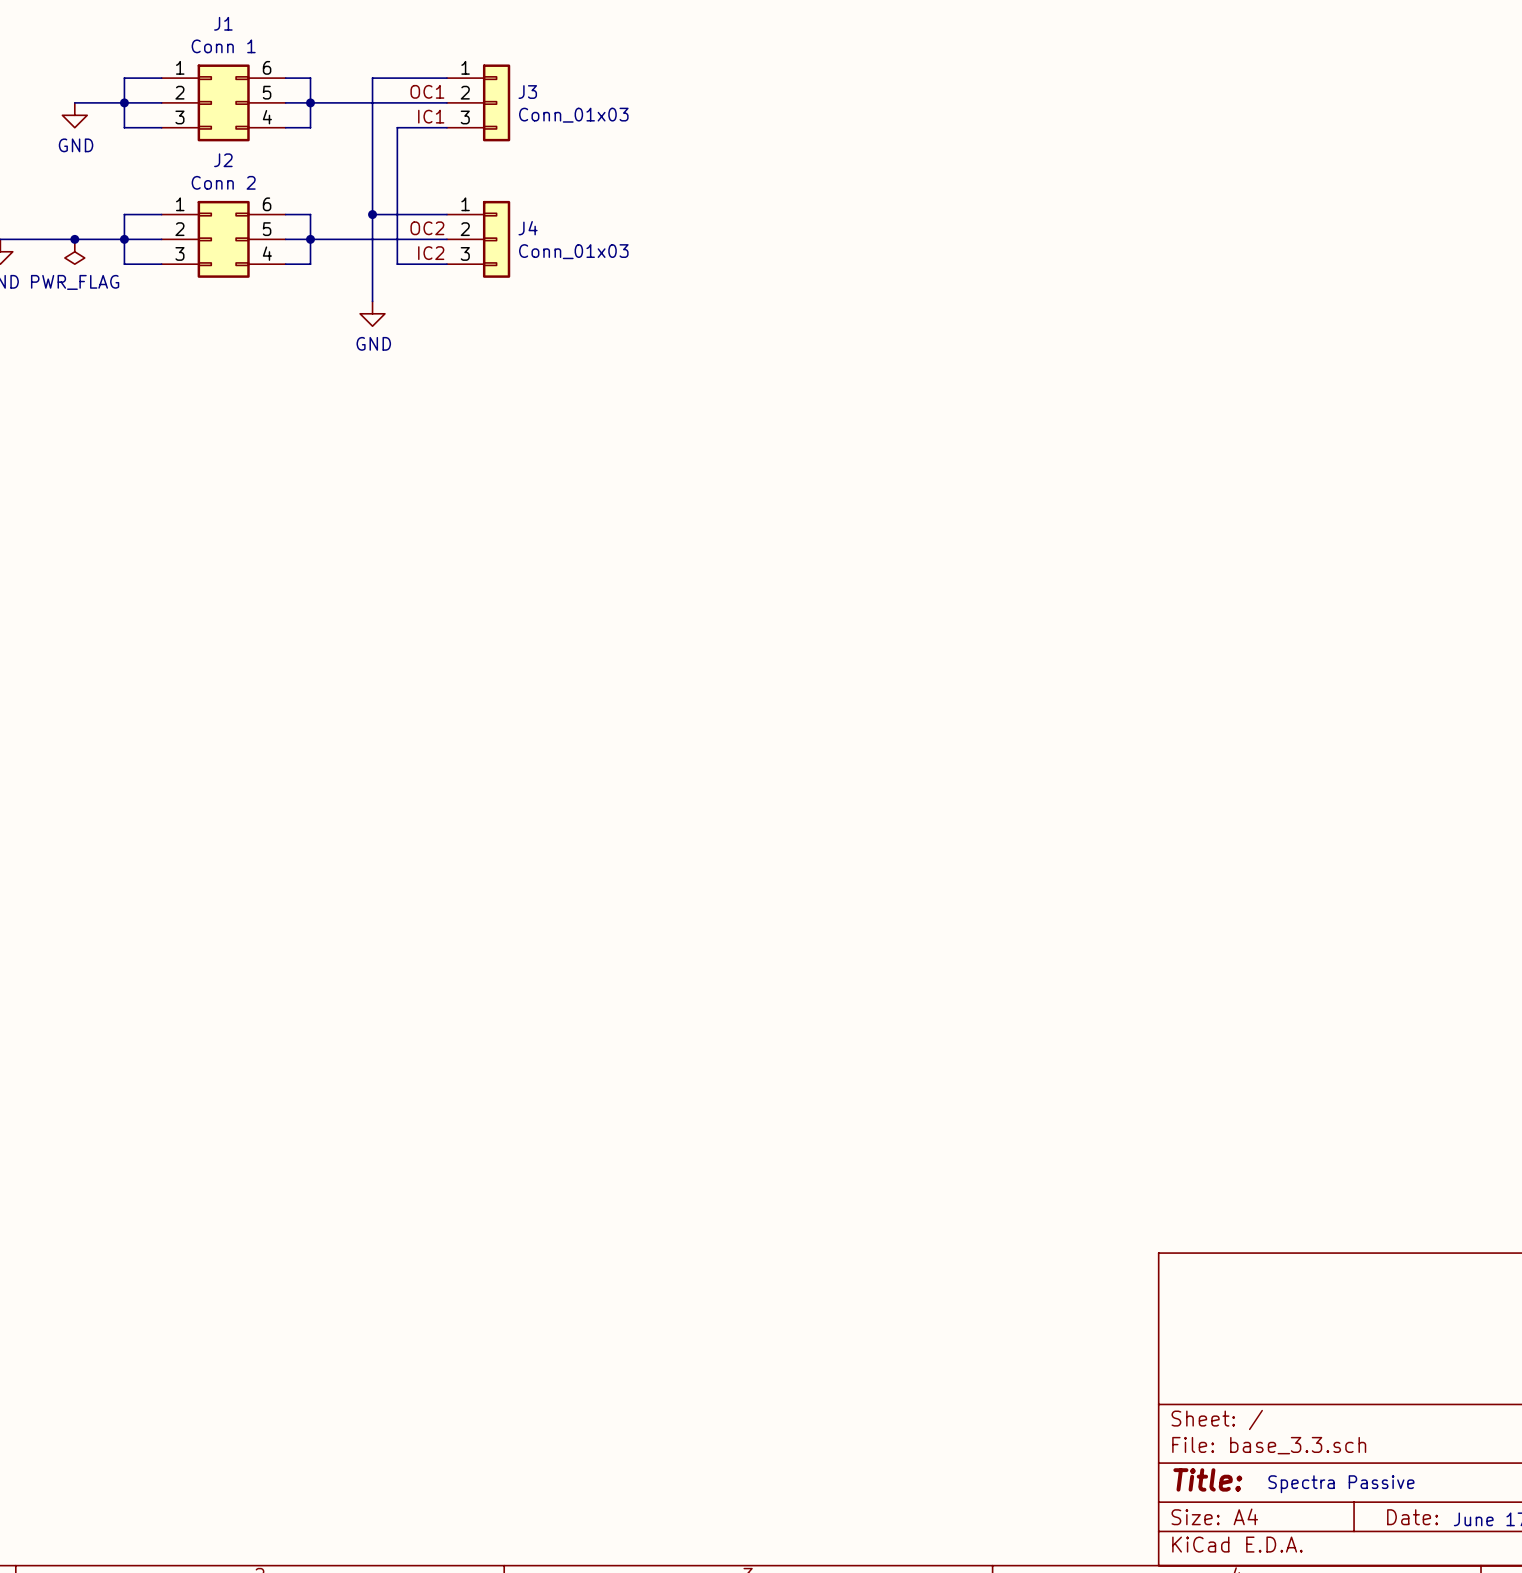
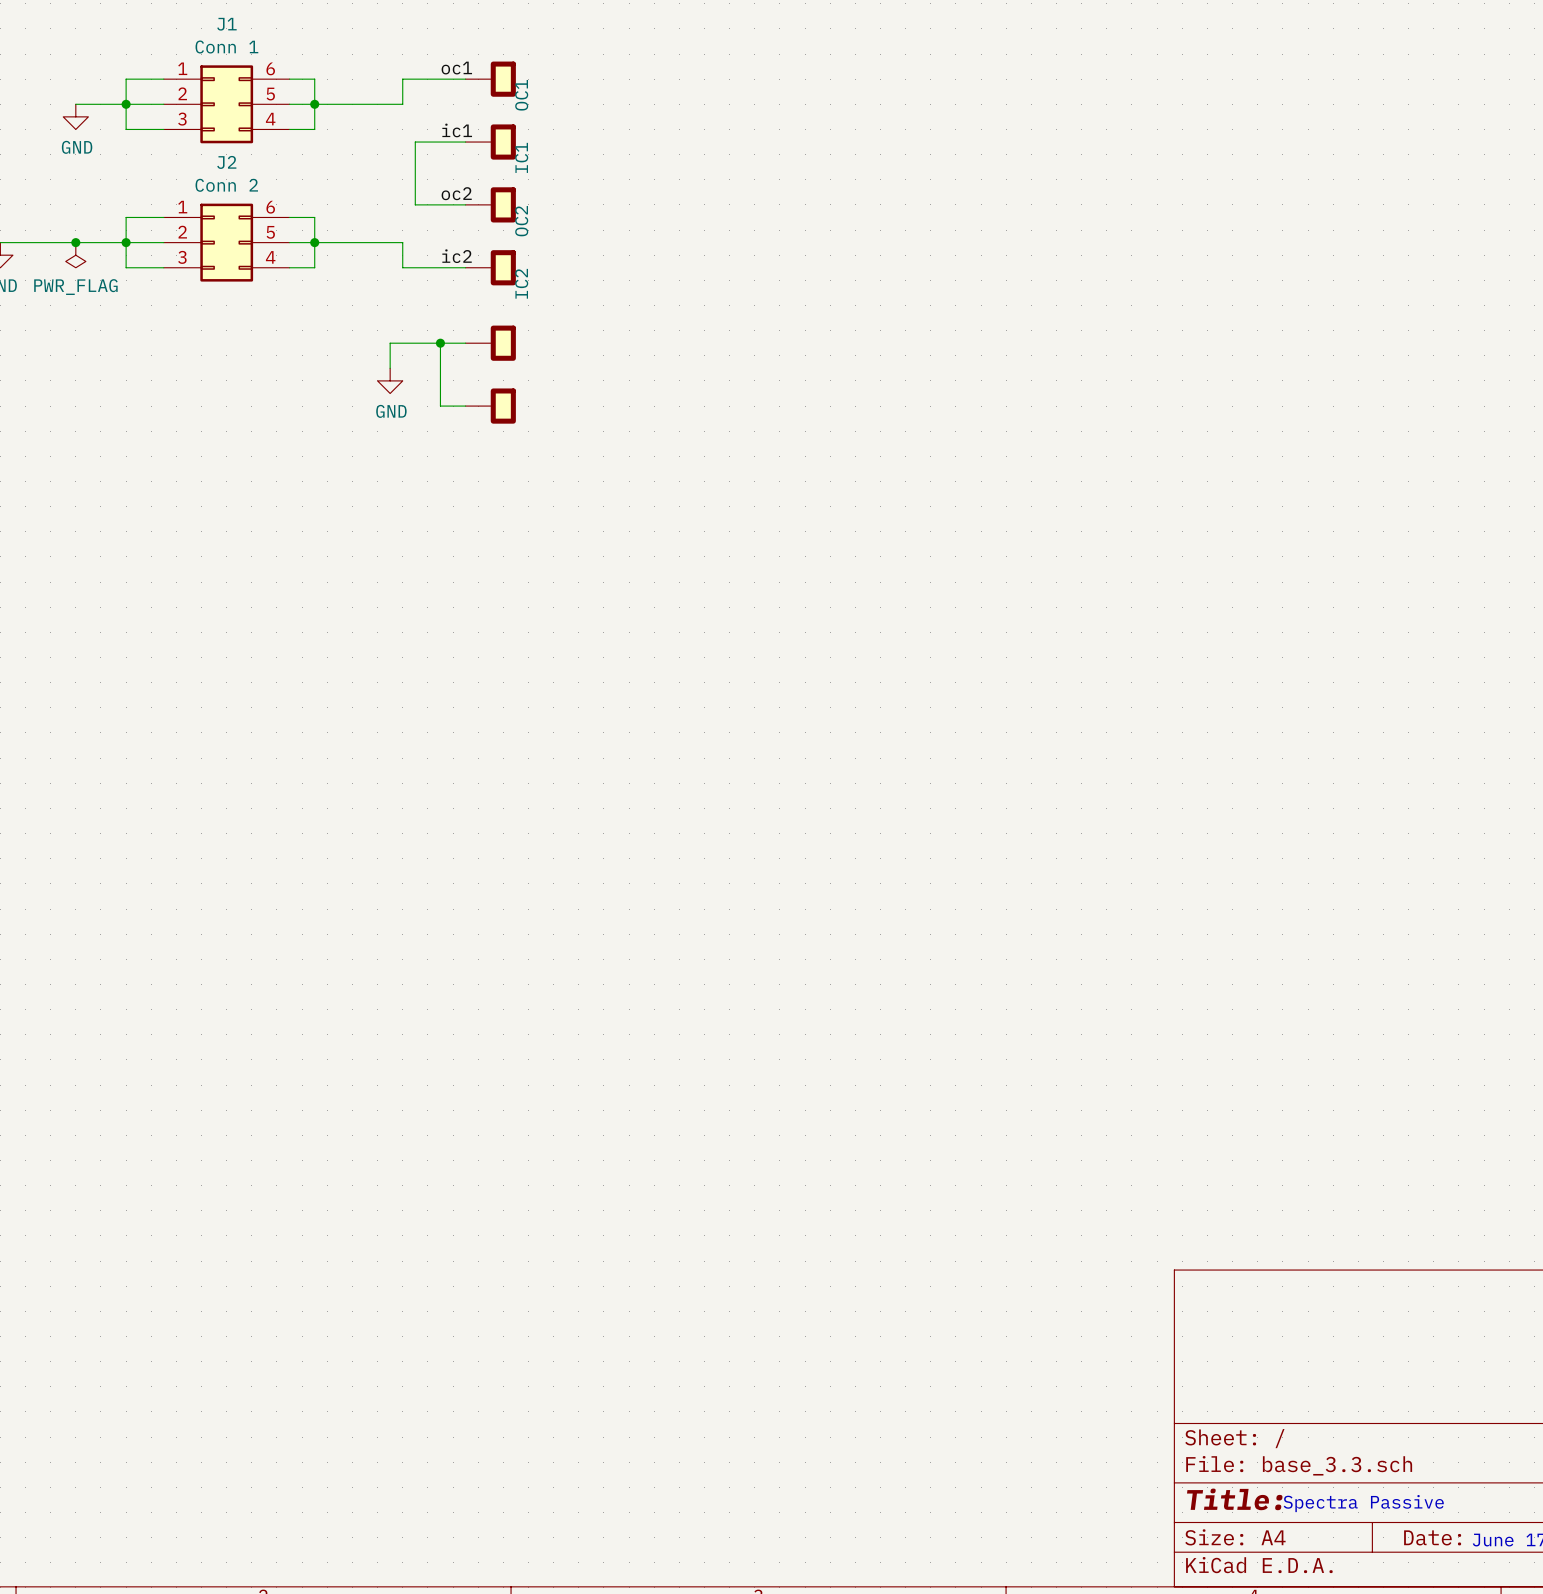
label: none -> oc1 (456, 68)
wire: (397, 78) (372, 78) (372, 301) -> none
OC1: none -> (490, 79)
label: OC1 (427, 91) -> none
wire: (397, 102) (446, 102) -> (402, 104) (402, 79)
J3: Conn_01x03 (478, 102) -> none
label: IC1 (431, 116) -> none
wire: (446, 127) (397, 127) (397, 239) (446, 239) -> none
label: none -> ic1 (457, 130)
wire: none -> (465, 142) (415, 142) (415, 204) (465, 204)
IC1: none -> (490, 142)
label: none -> oc2 (456, 193)
OC2: none -> (490, 204)
wire: (372, 214) (446, 214) -> none
junction: (372, 214) -> none
label: OC2 (427, 228) -> none
J4: Conn_01x03 (478, 239) -> none
label: IC2 (431, 253) -> none
label: none -> ic2 (457, 256)
IC2: none -> (490, 267)
power symbol position: GND (372, 313) -> GND (390, 380)
wire: none -> (440, 343) (440, 406) (465, 406)
junction: none -> (440, 343)
wire: none -> (465, 343) (390, 343) (390, 368)
part: none -> (490, 343)
part: none -> (490, 406)

